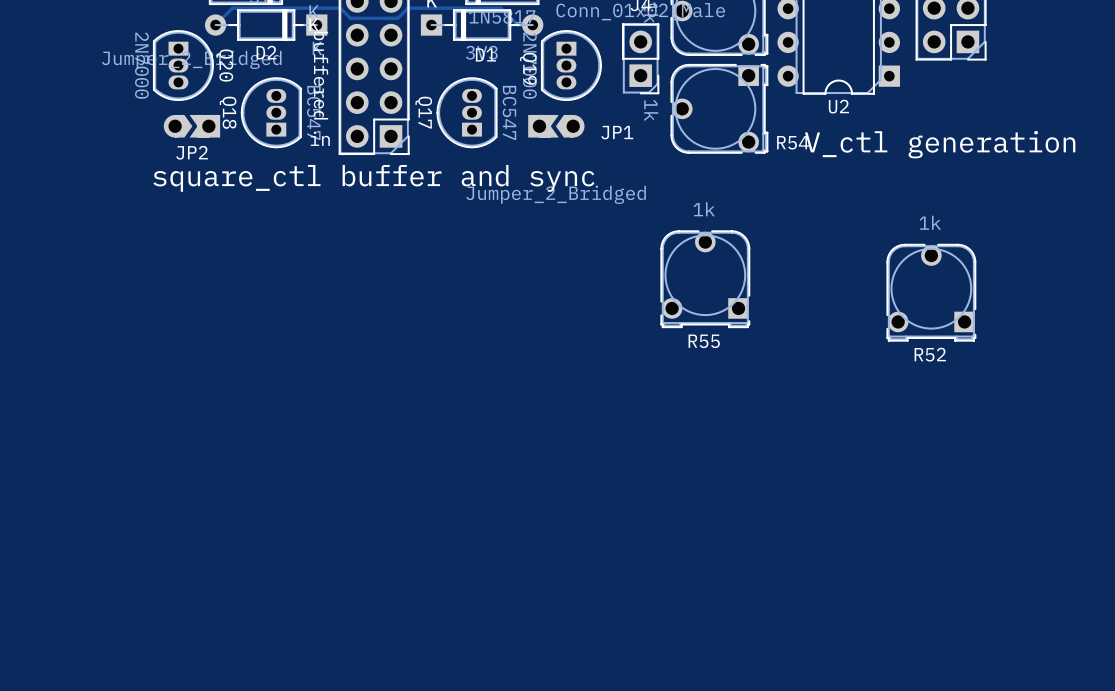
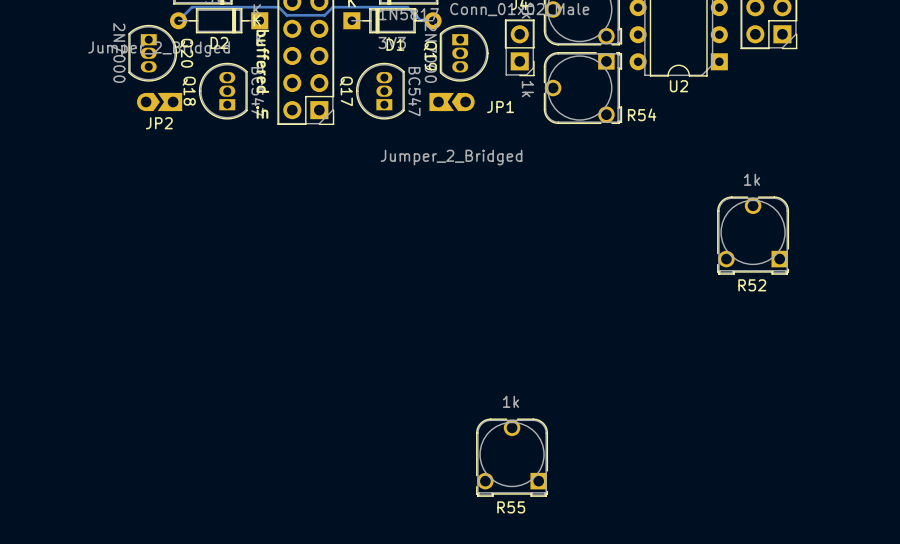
text: V_ctl generation (940, 144) -> none
text: square_ctl buffer and sync (373, 178) -> none
R55 position: (705, 279) -> (512, 457)

